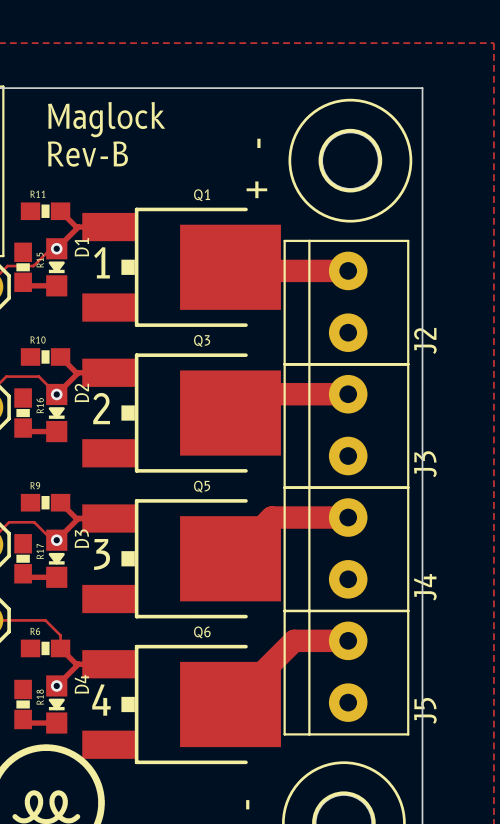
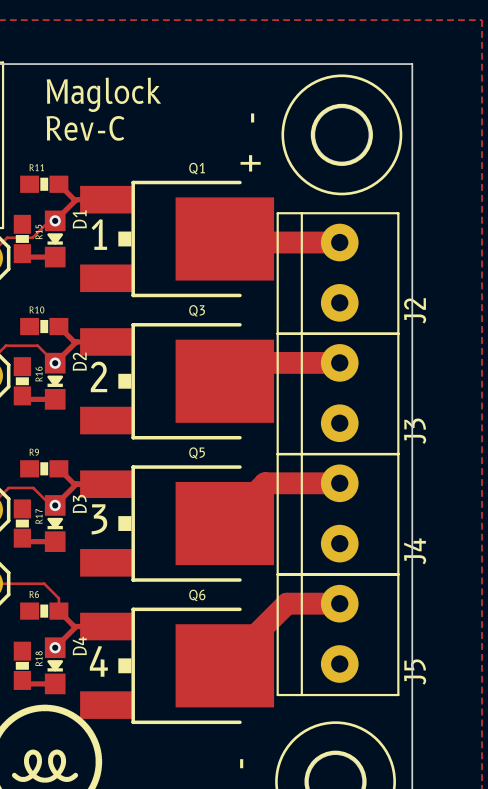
text: Rev-B (87, 154) -> Rev-C (85, 128)

